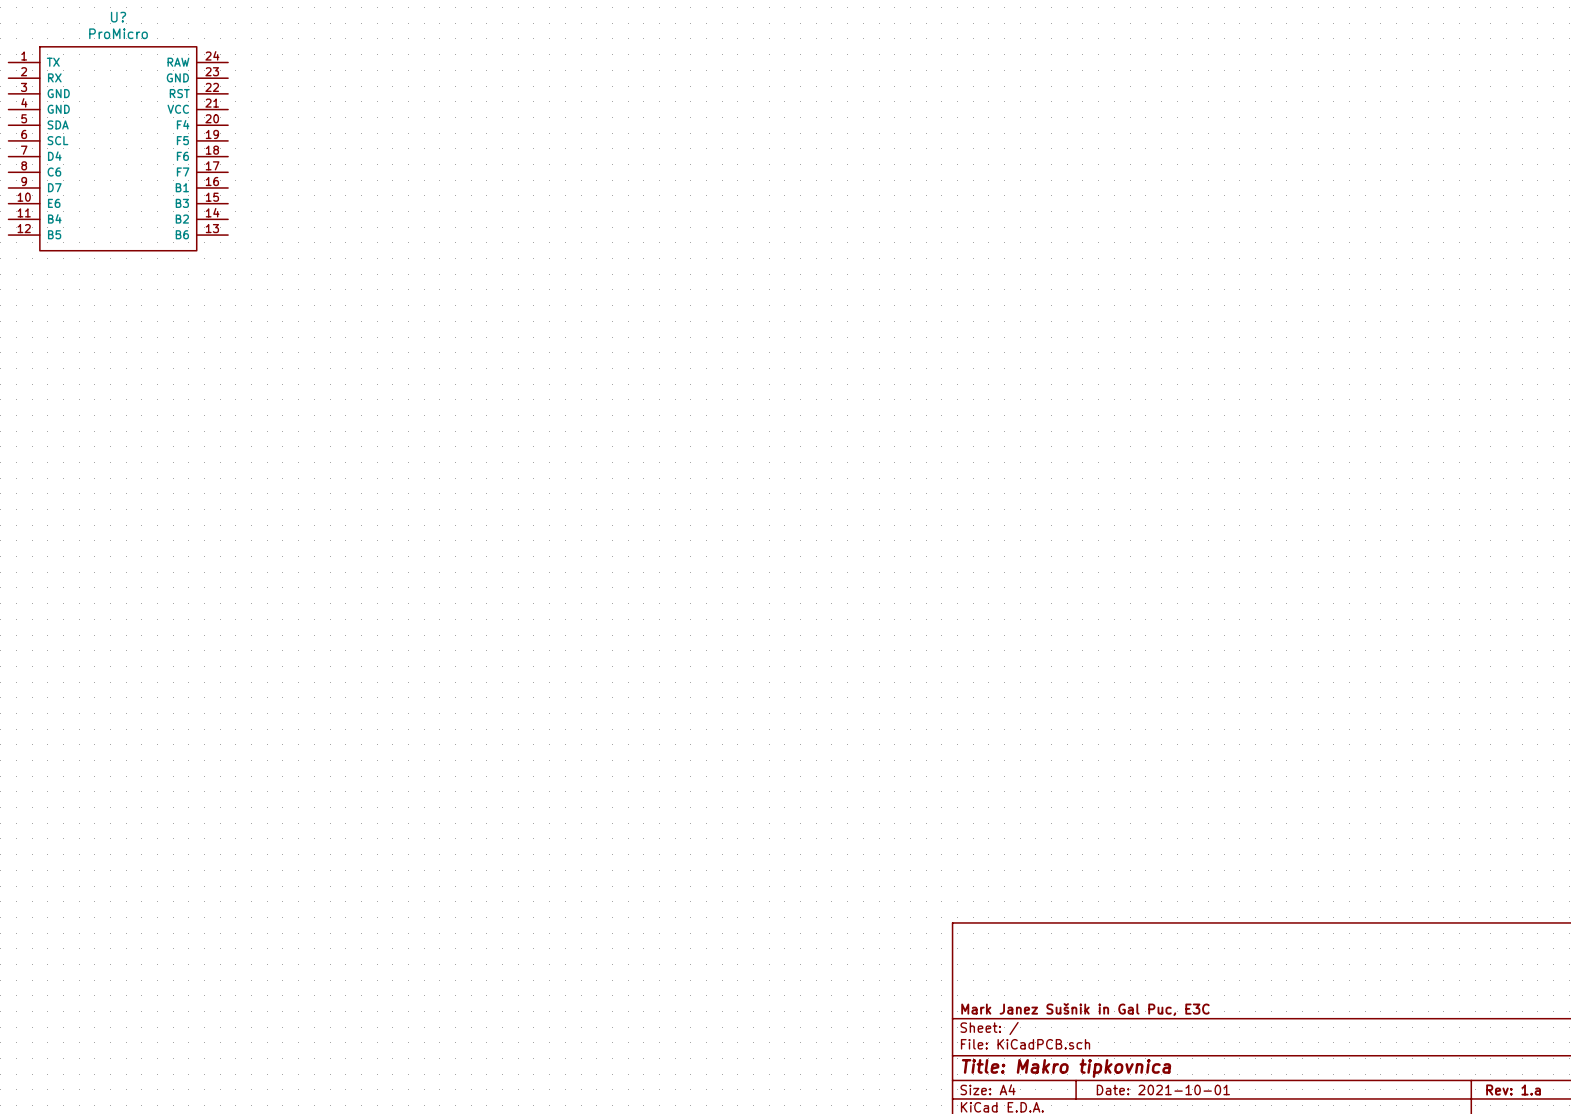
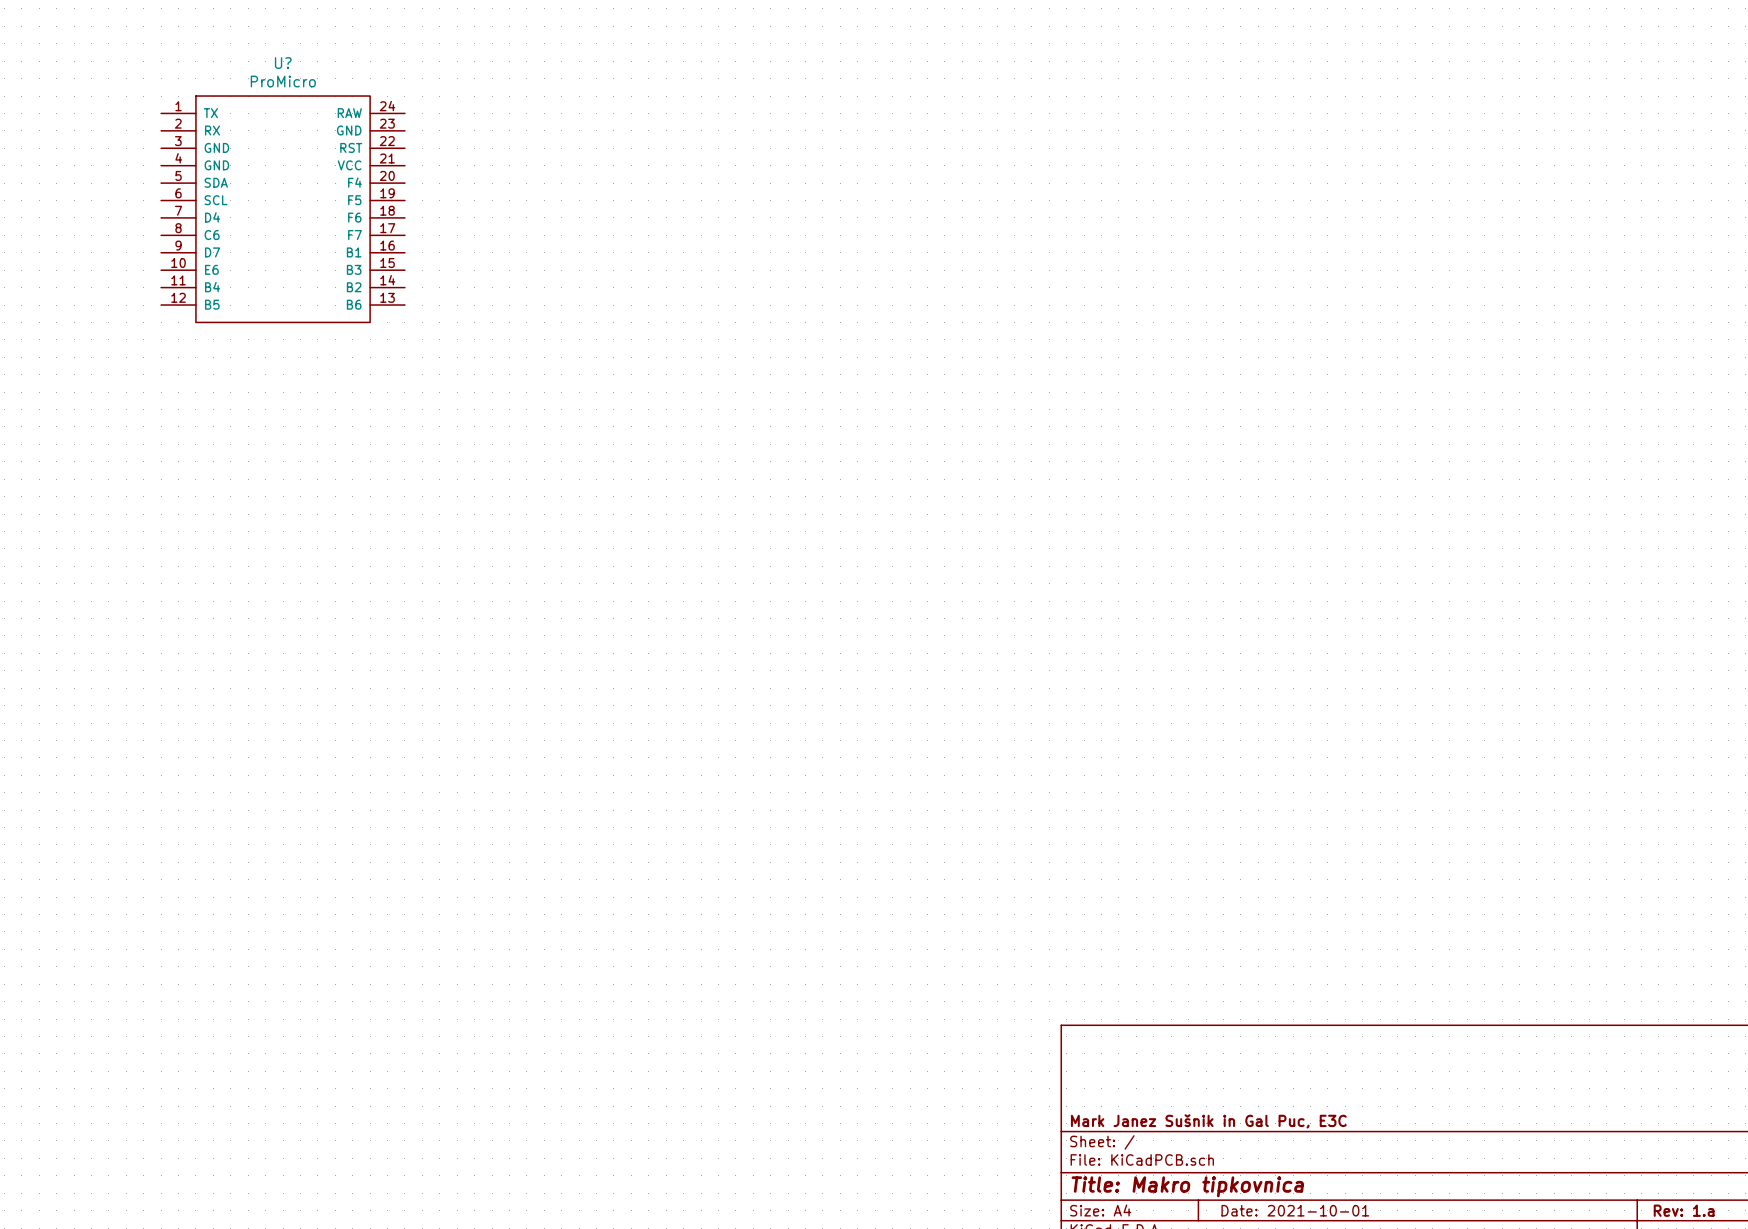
U? position: (118, 148) -> (283, 209)

